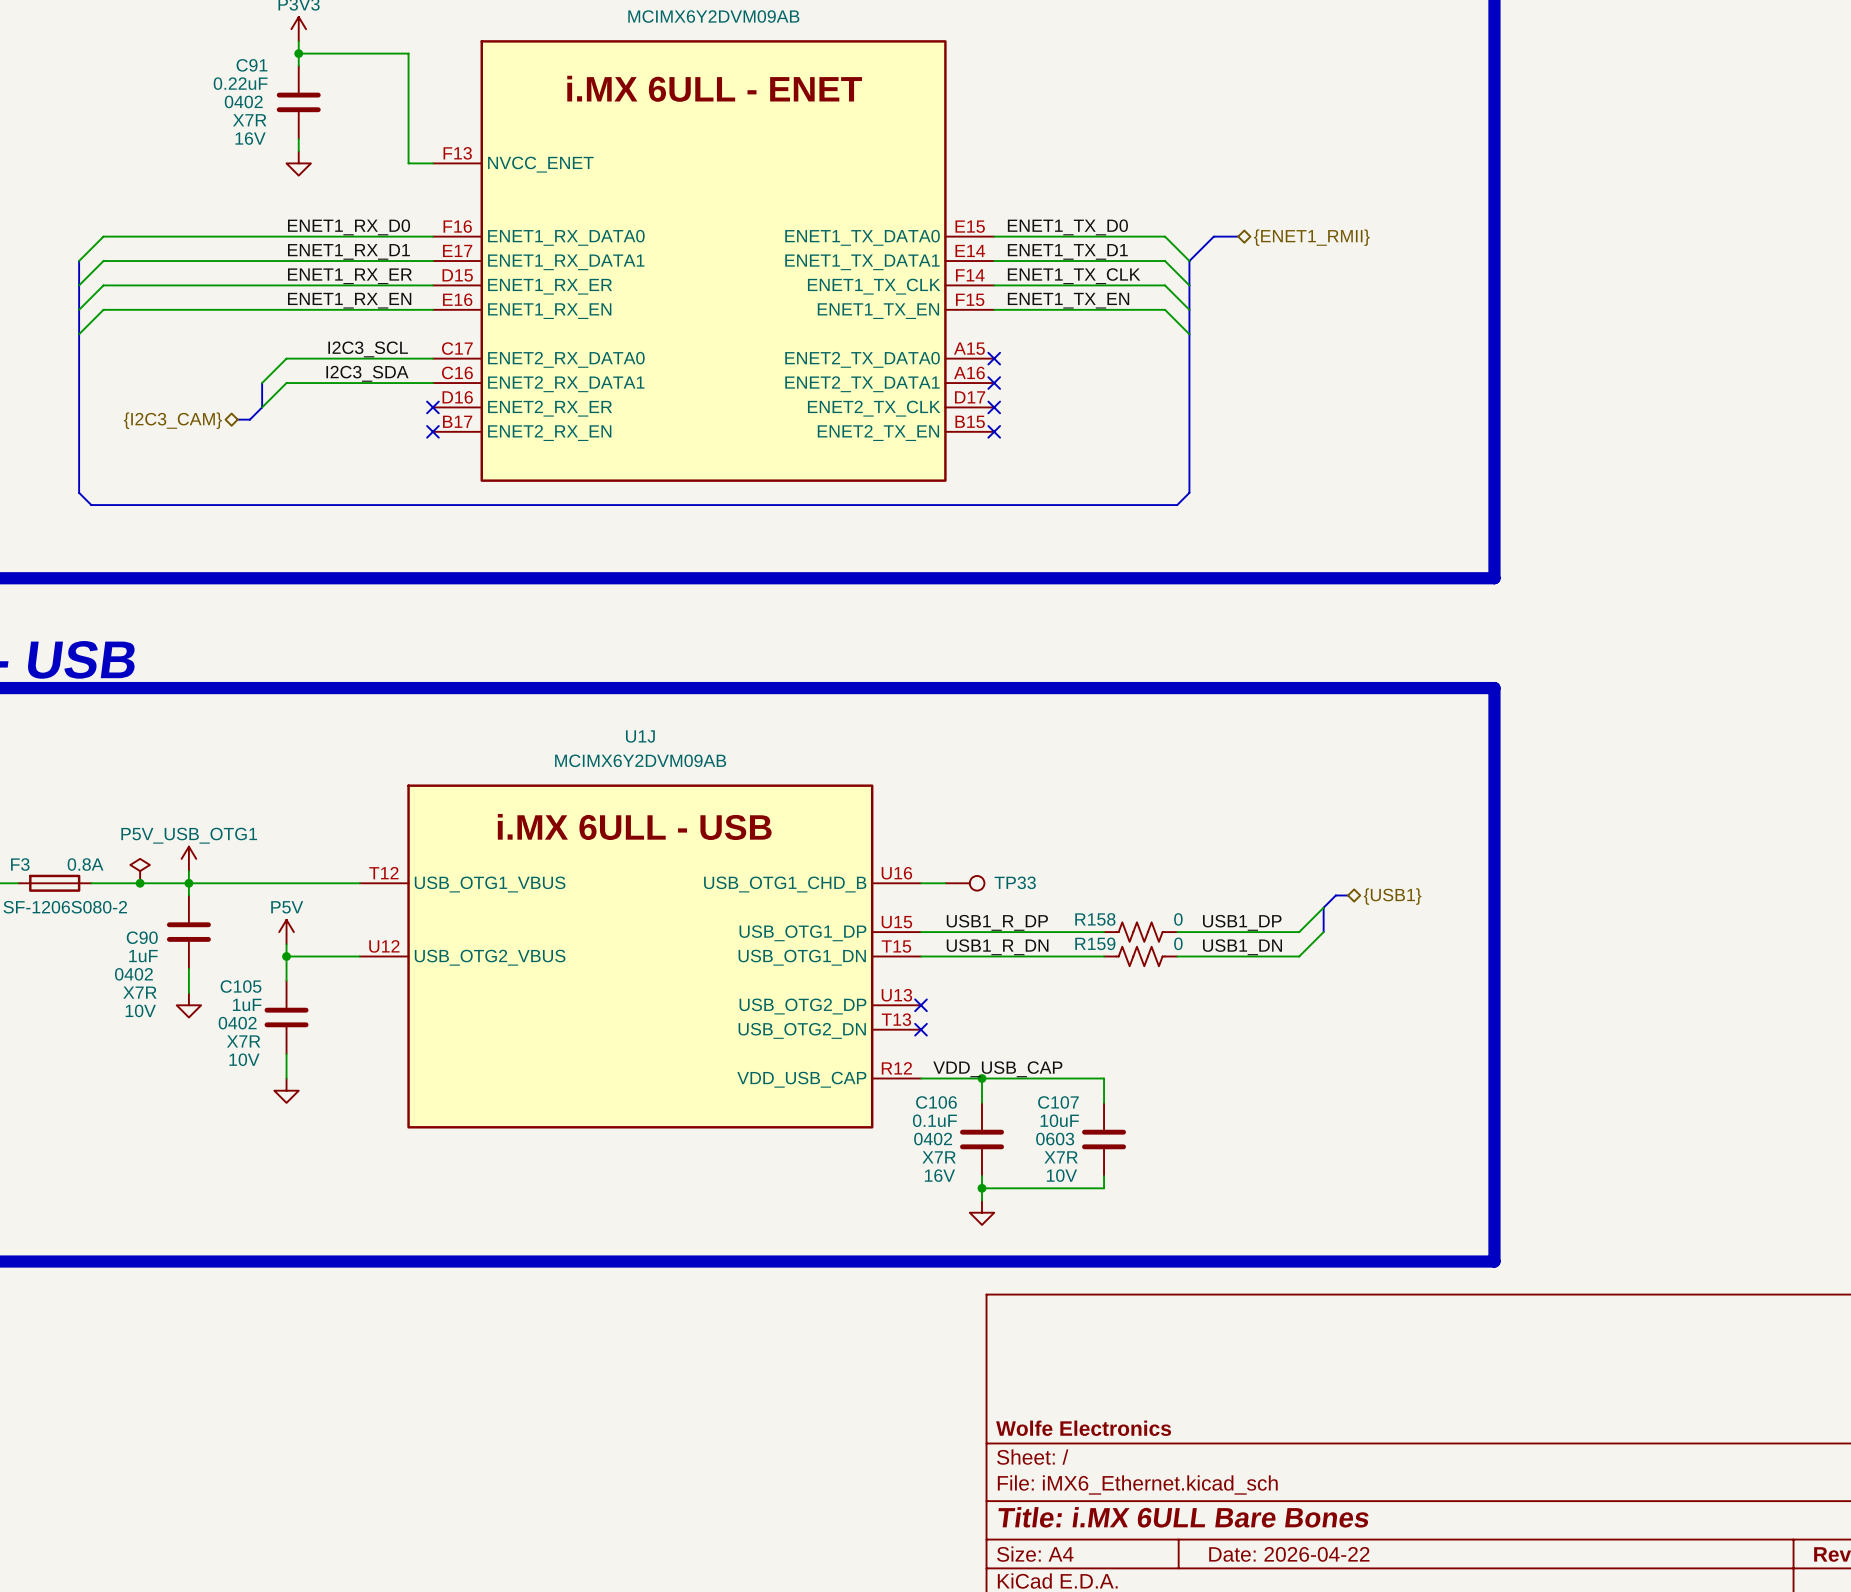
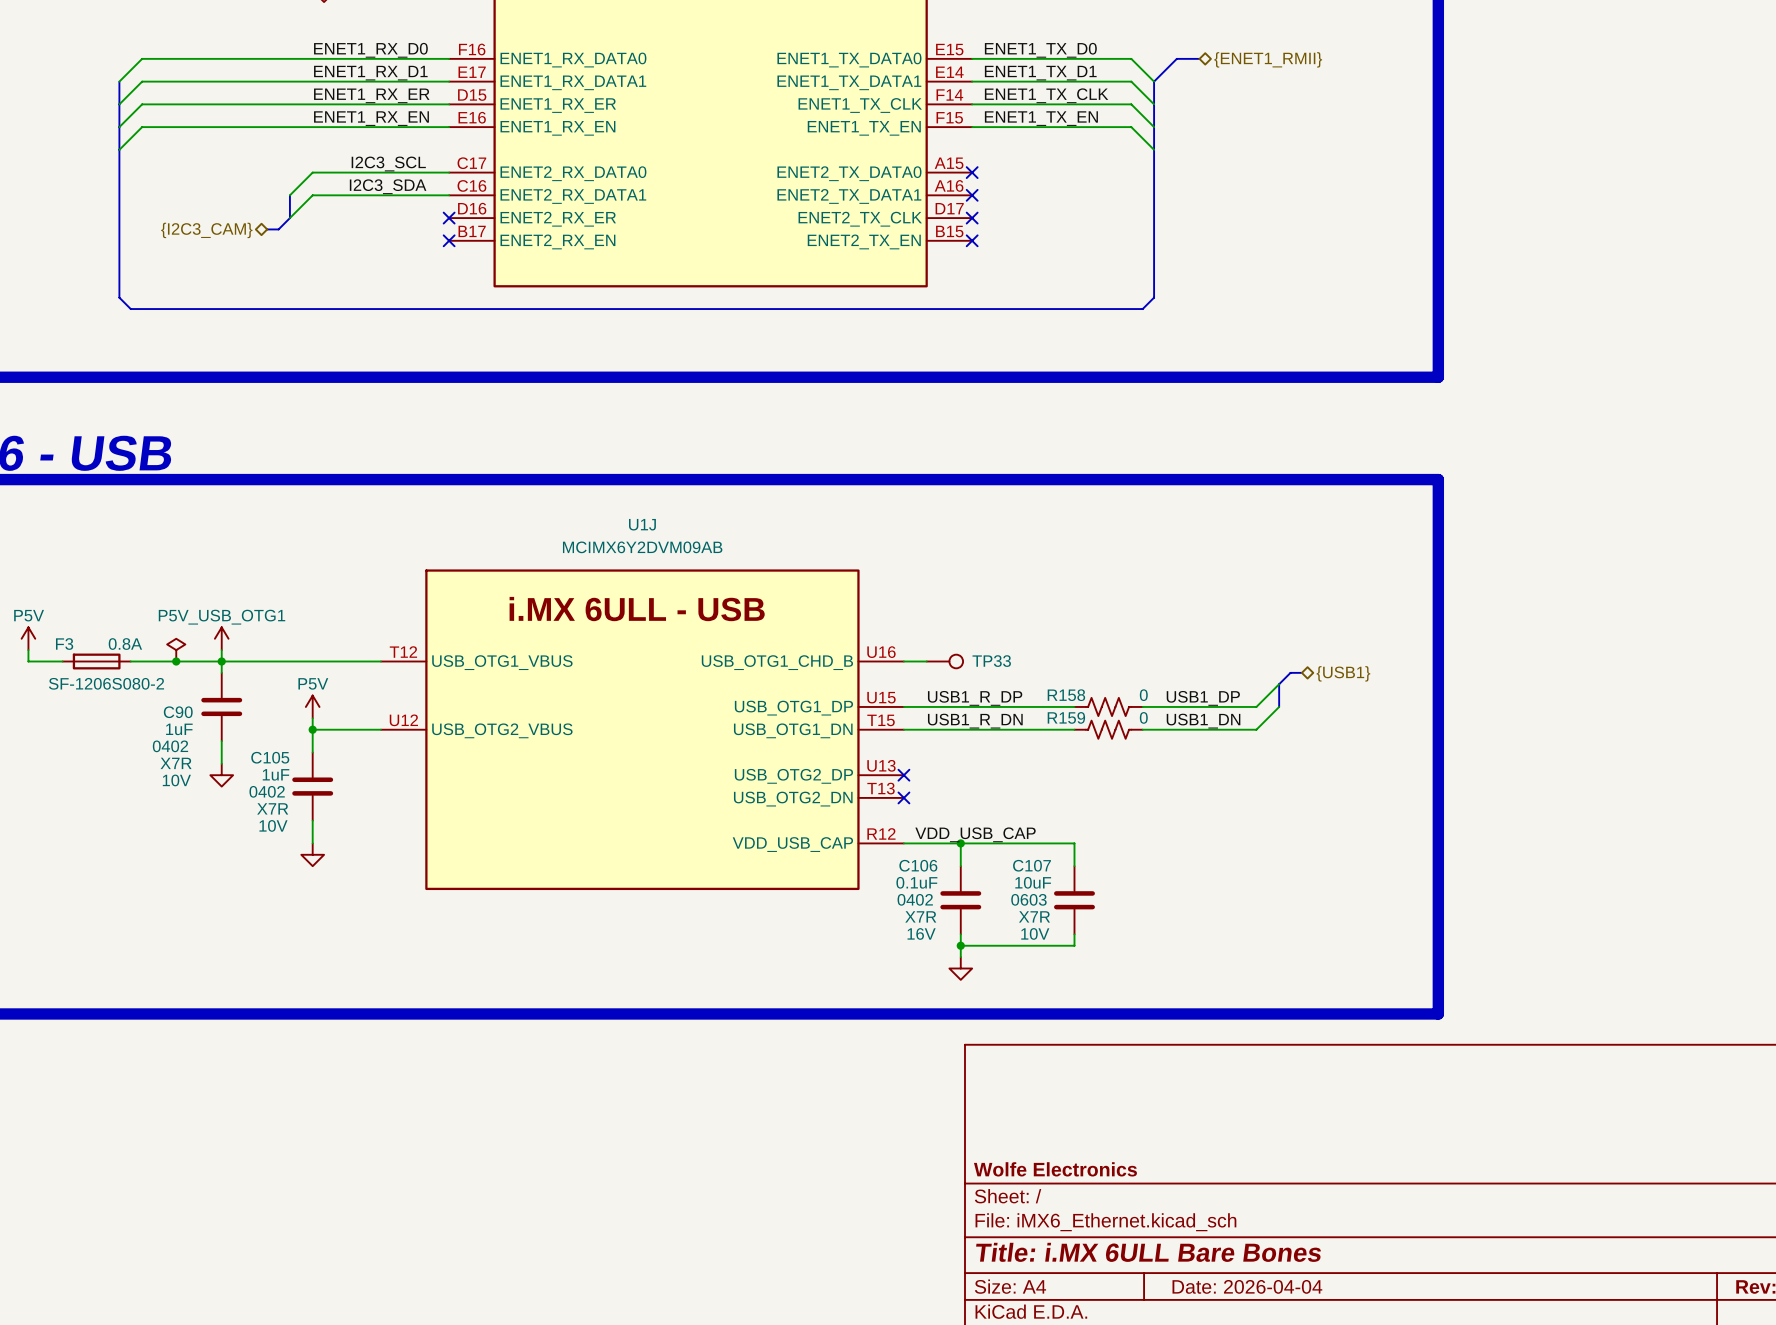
title block: Date: 2026-04-22 (1289, 1554) -> Date: 2026-04-04 (1247, 1286)

